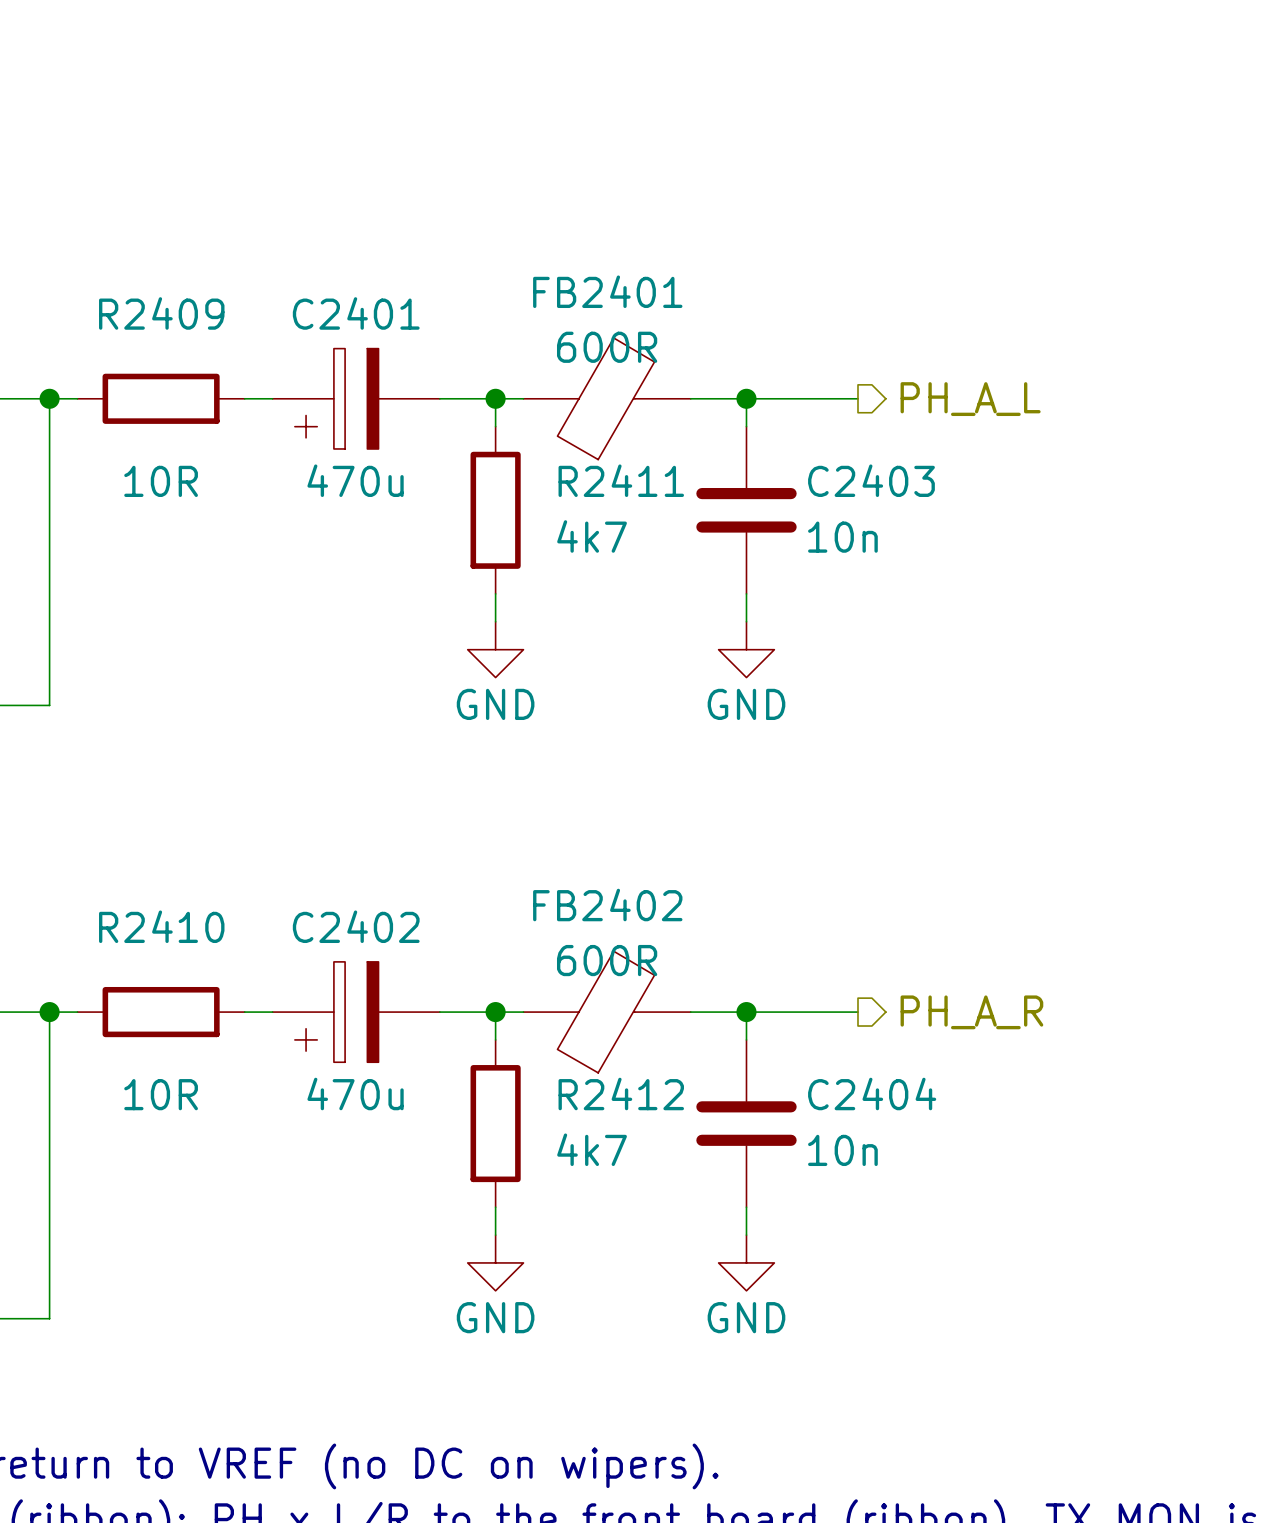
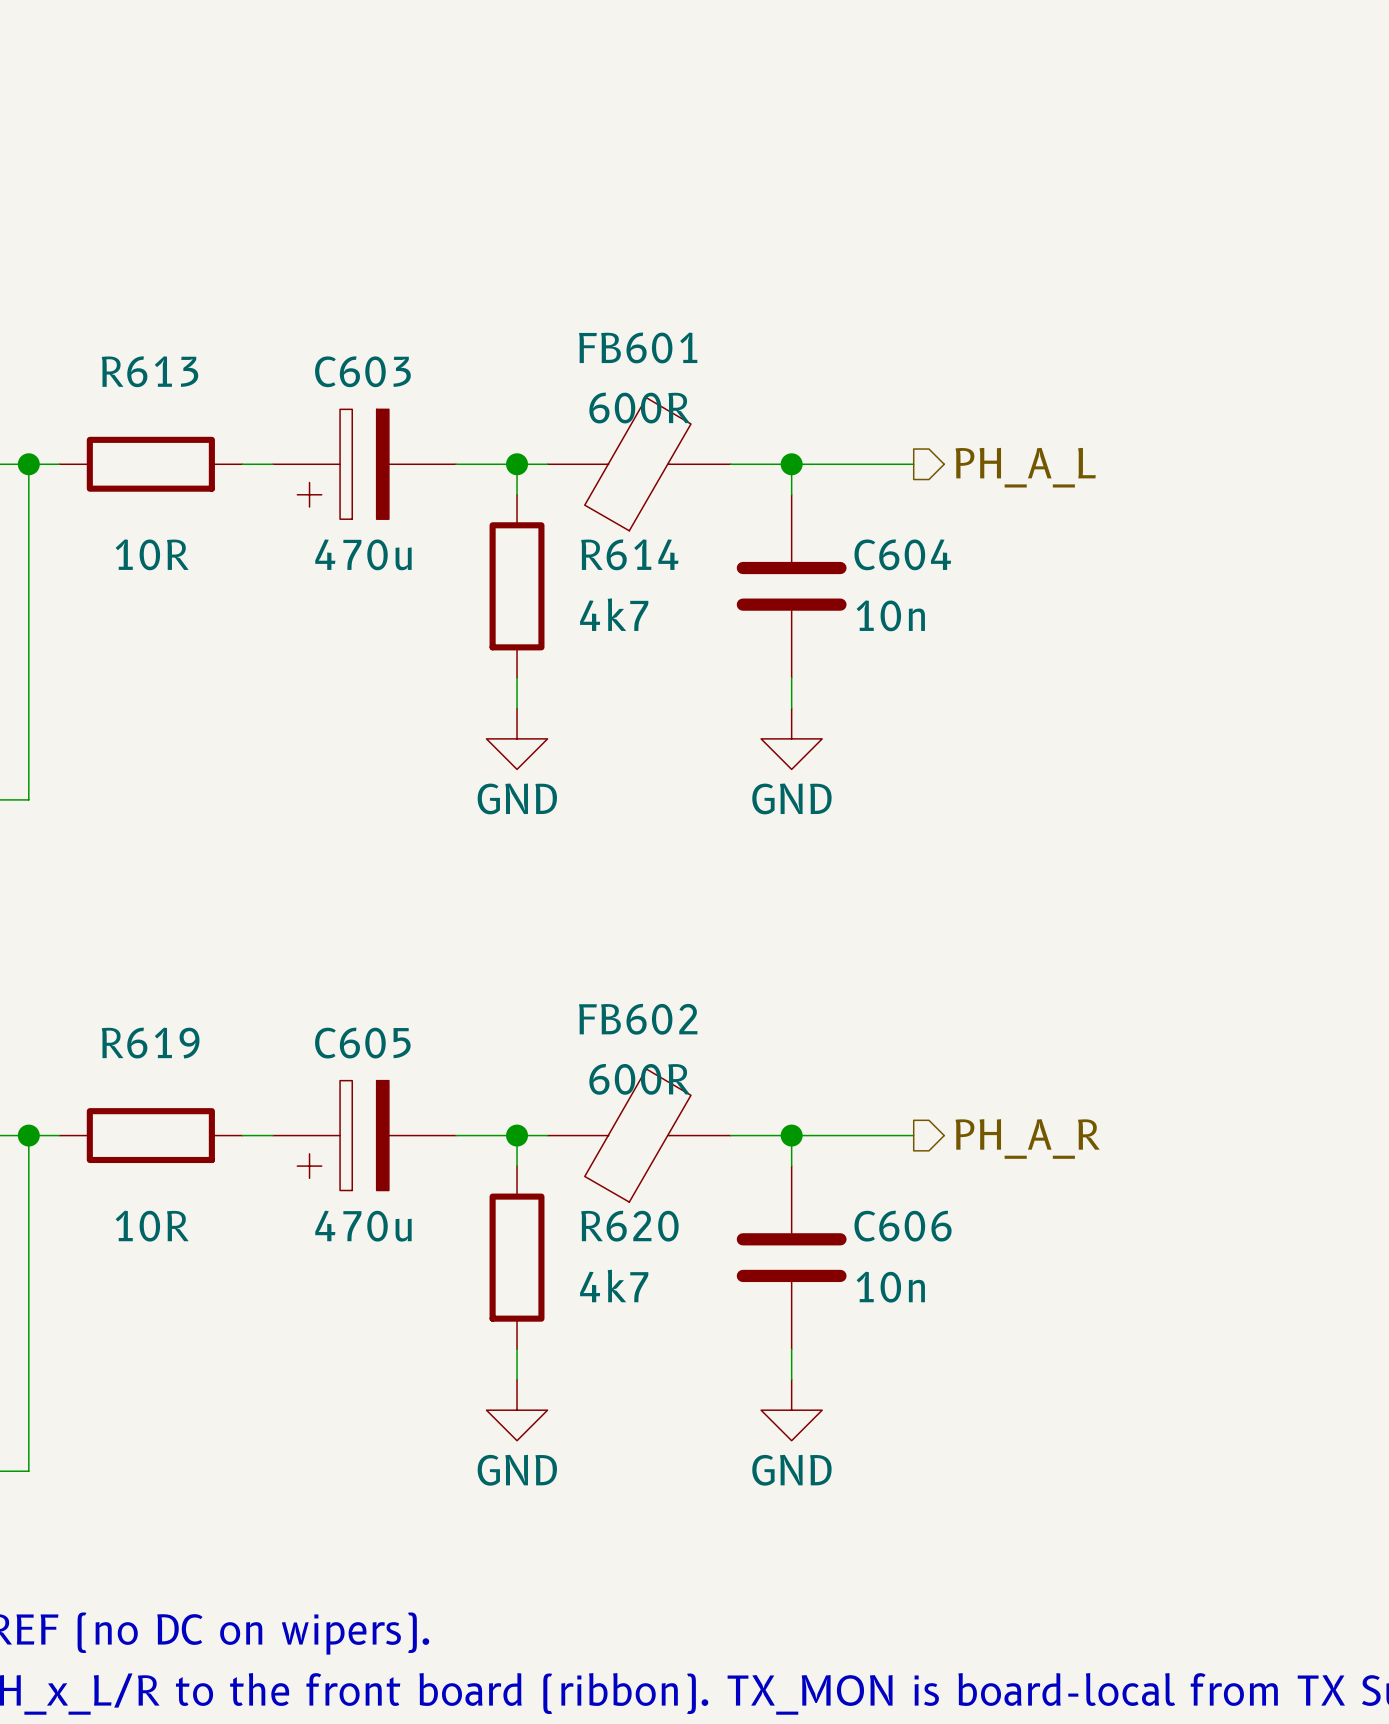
FB2401 name: FB2401 (607, 291) -> FB601 (638, 347)
R2409 name: R2409 (161, 313) -> R613 (149, 371)
C2401 name: C2401 (356, 313) -> C603 (362, 371)
R2411 name: R2411 (621, 480) -> R614 (629, 554)
C2403 name: C2403 (871, 480) -> C604 (902, 554)
FB2402 name: FB2402 (607, 905) -> FB602 (638, 1019)
R2410 name: R2410 (161, 926) -> R619 (150, 1043)
C2402 name: C2402 (356, 926) -> C605 (362, 1043)
R2412 name: R2412 (621, 1093) -> R620 (629, 1226)
C2404 name: C2404 (872, 1093) -> C606 (903, 1226)

